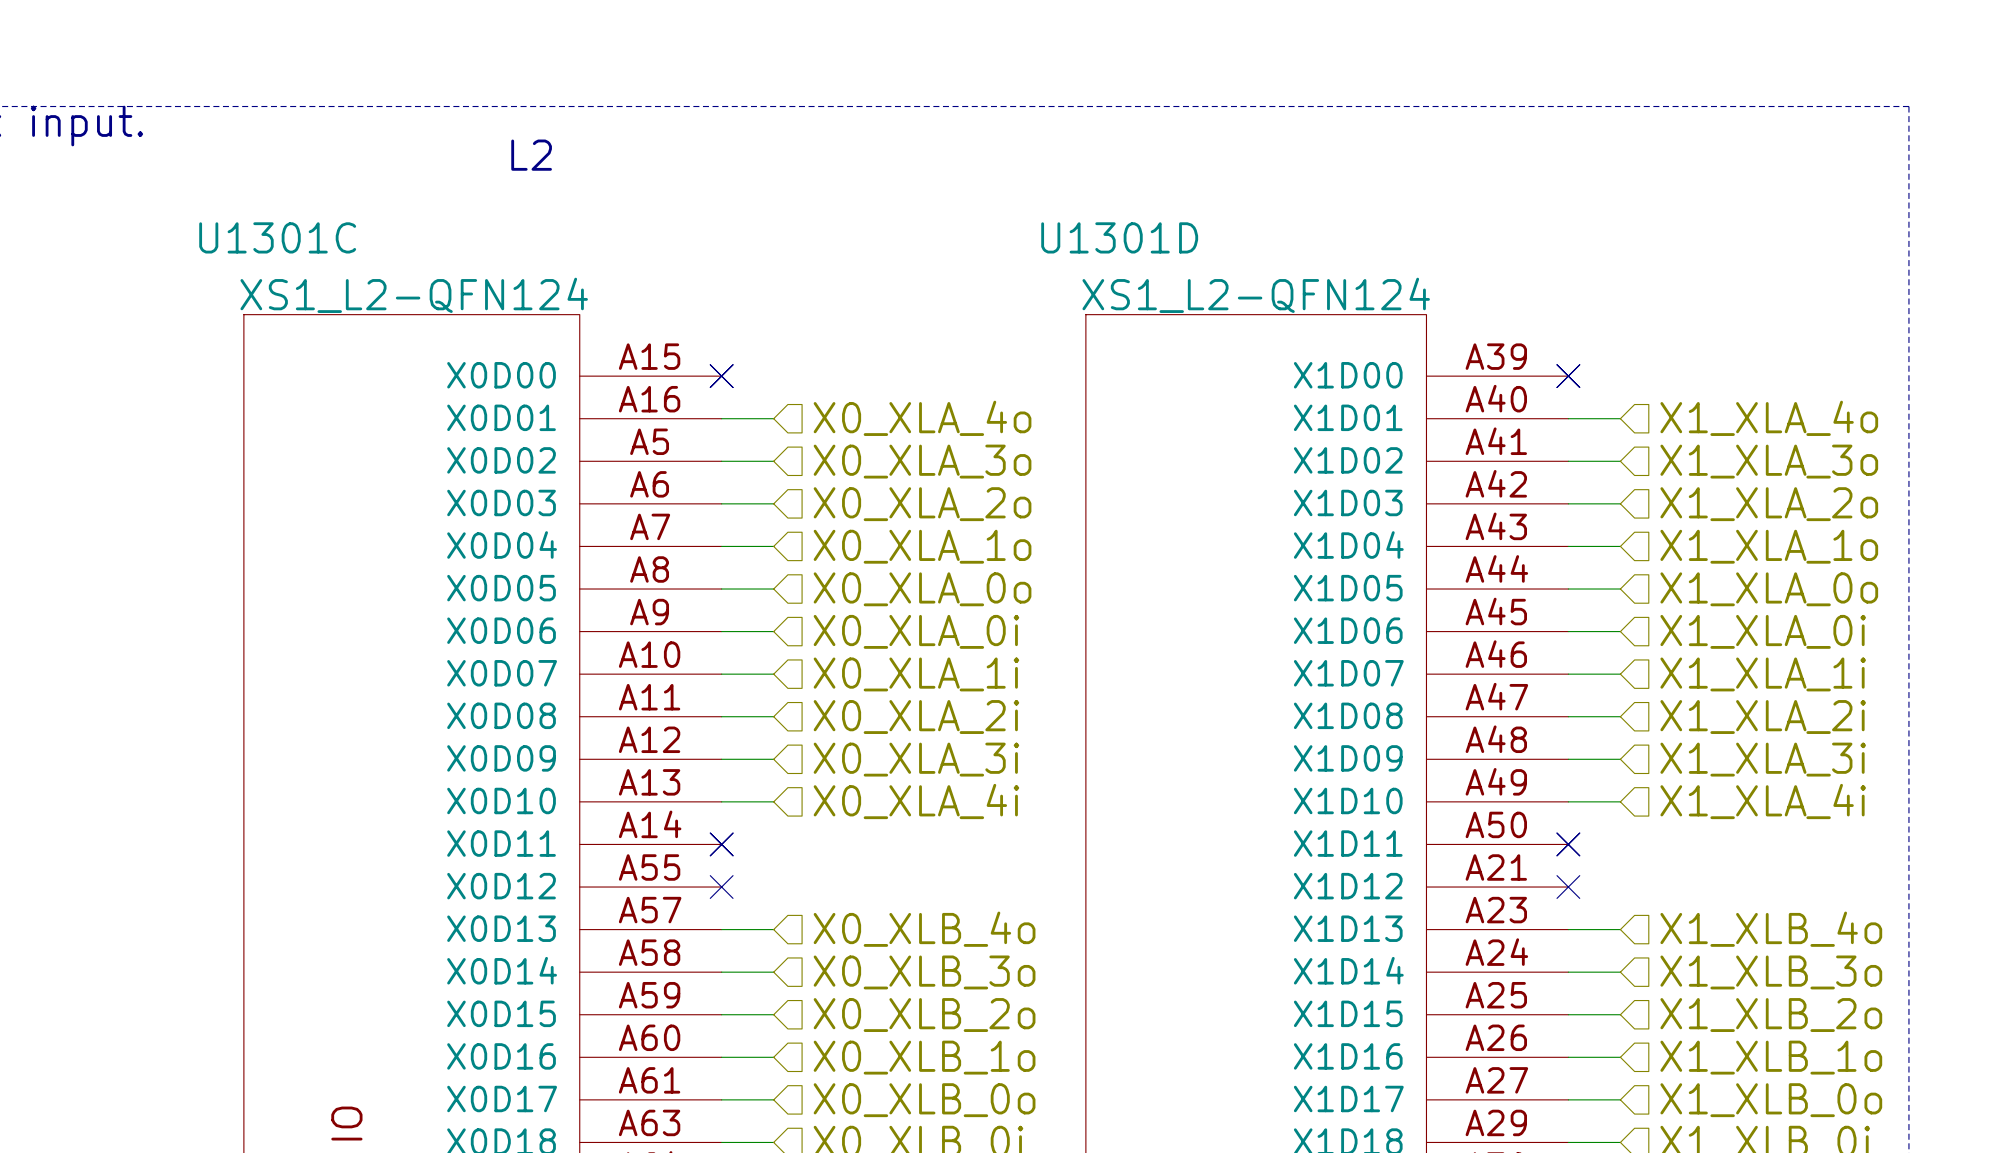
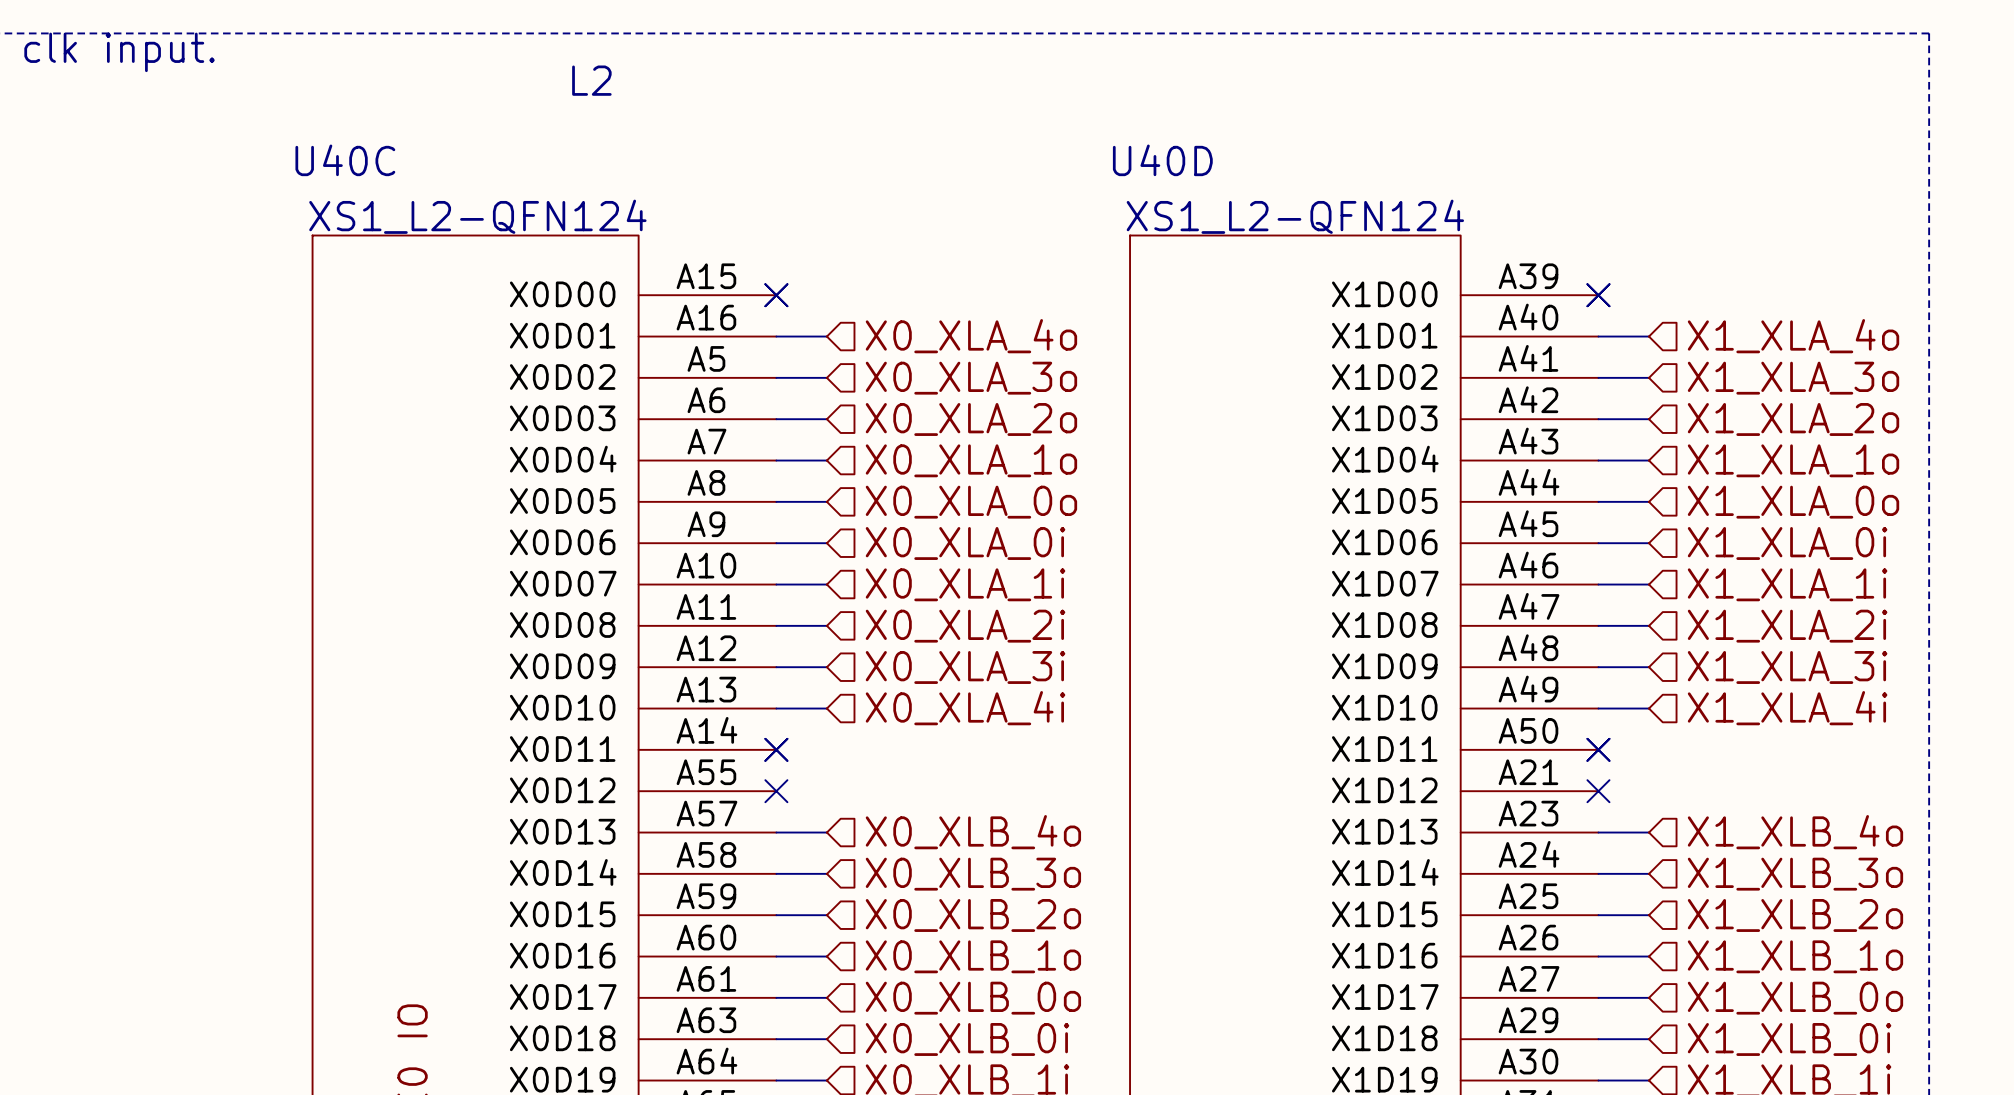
U1301C name: U1301C (277, 237) -> U40C (345, 160)
U1301D name: U1301D (1119, 237) -> U40D (1162, 160)

